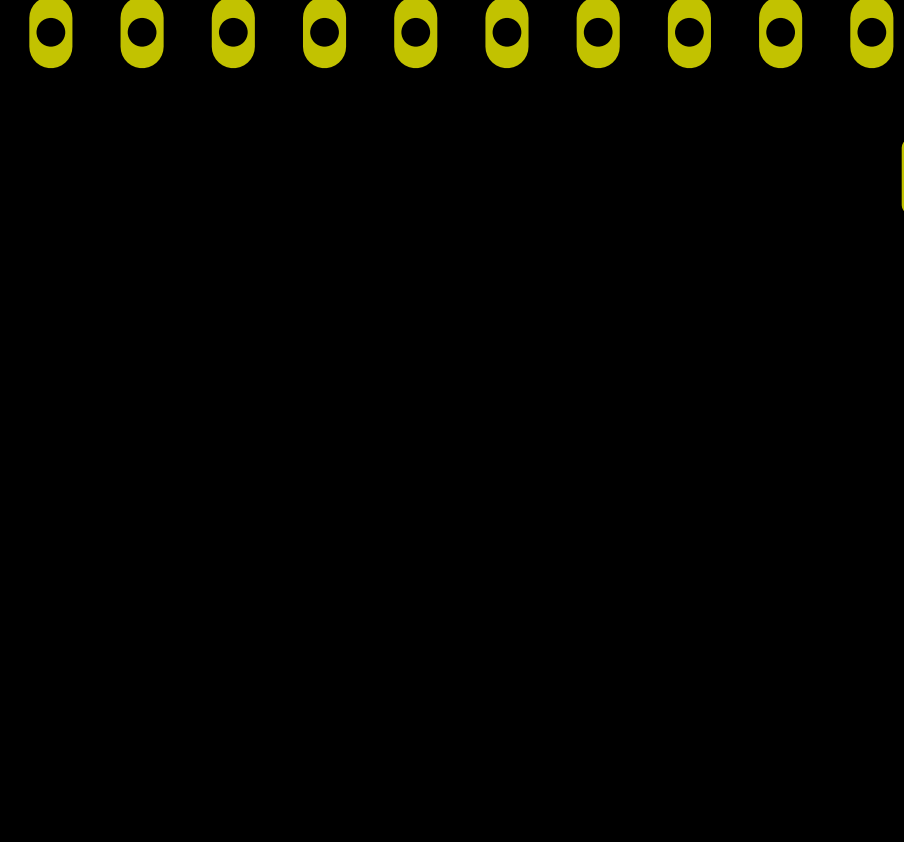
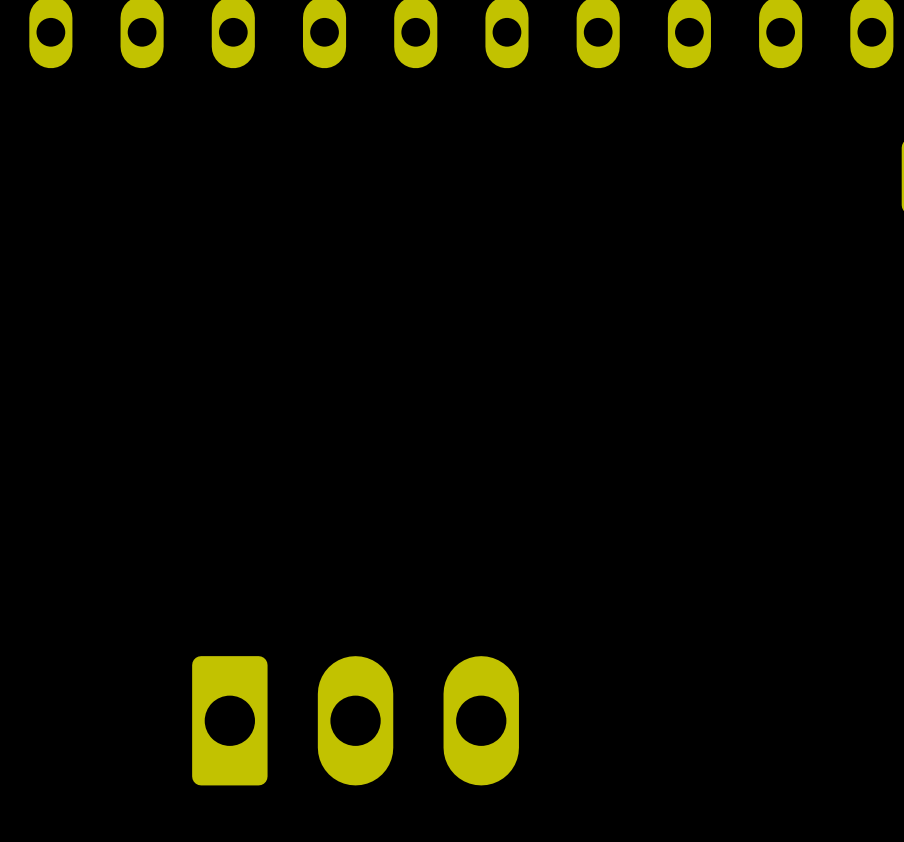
part: none -> (355, 720)

